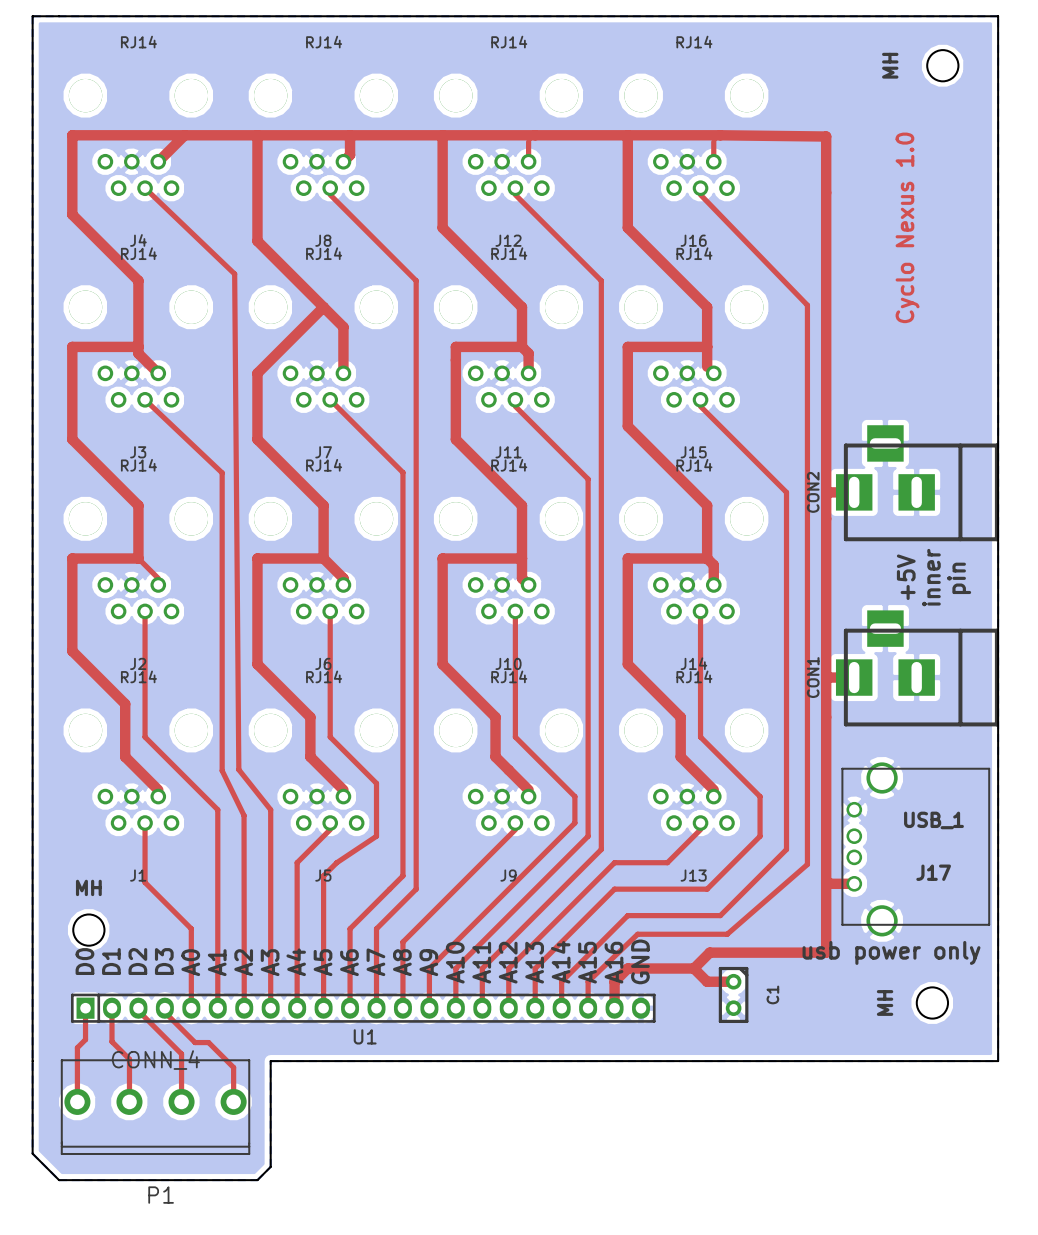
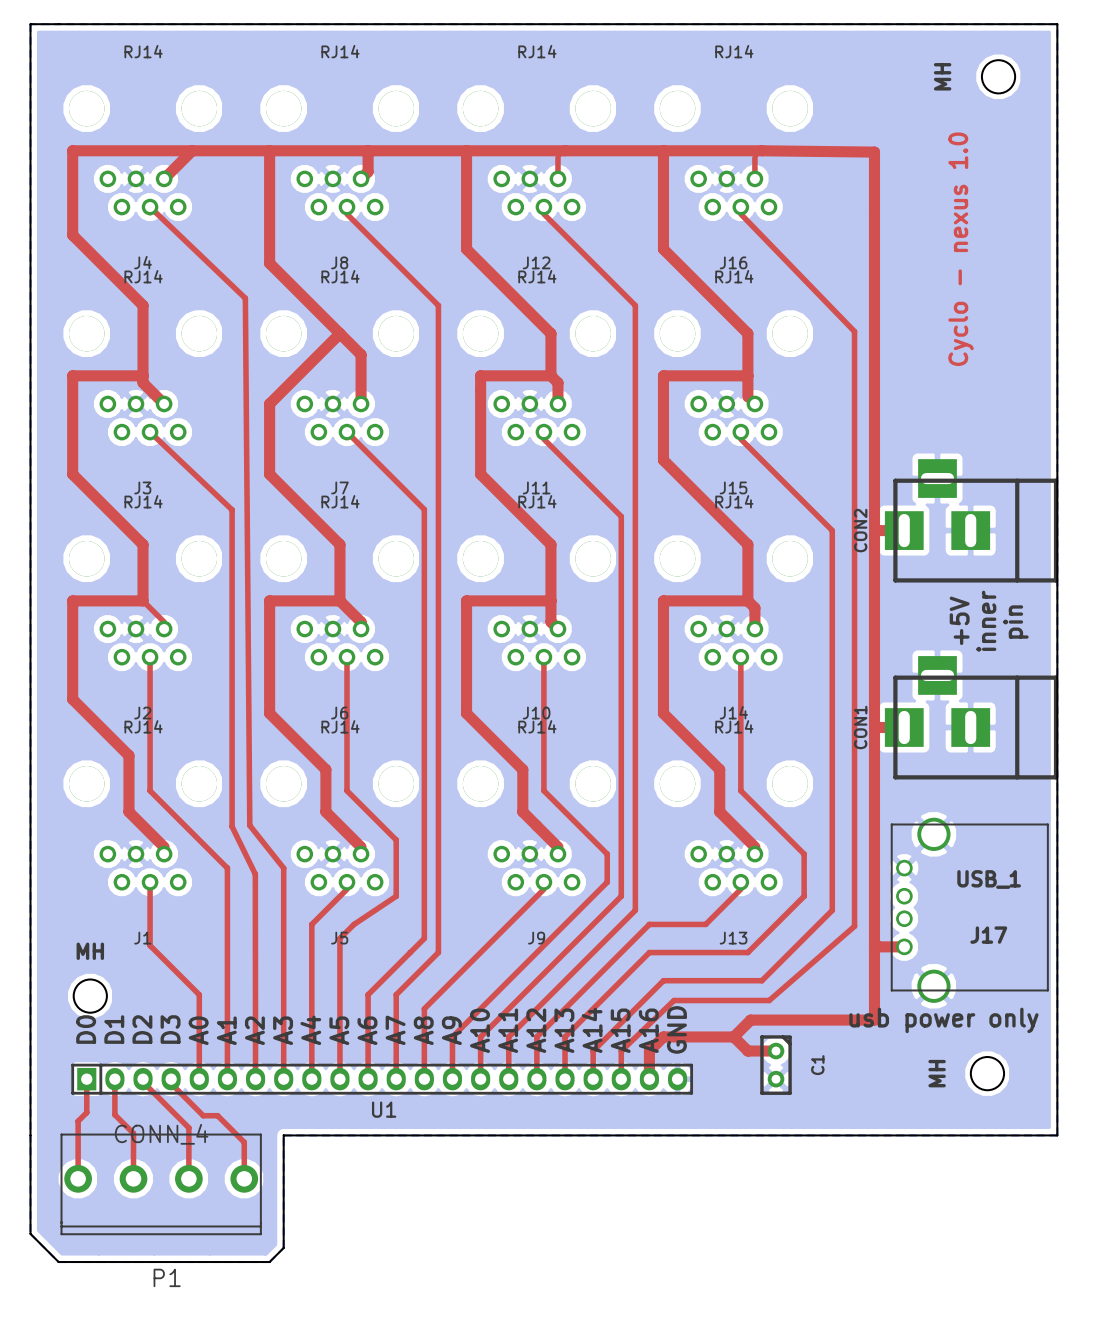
text: Cyclo Nexus 1.0 (907, 227) -> Cyclo - nexus 1.0 (961, 249)

